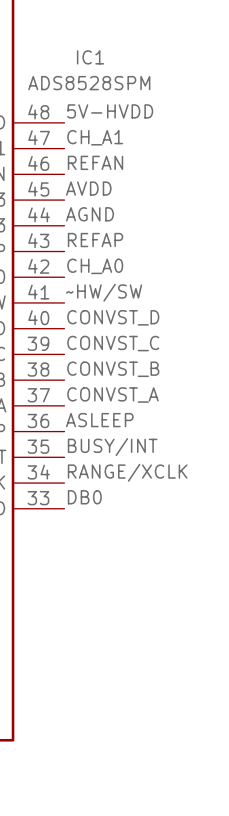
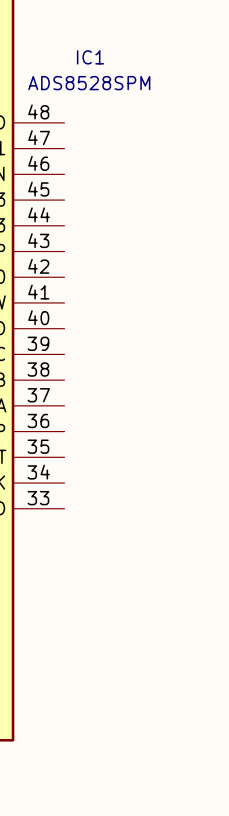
label: 5V-HVDD (110, 111) -> none
label: CH_A1 (95, 137) -> none
label: REFAN (95, 162) -> none
label: AVDD (88, 188) -> none
label: AGND (90, 214) -> none
label: REFAP (95, 240) -> none
label: CH_A0 (95, 266) -> none
label: ~HW/SW (104, 292) -> none
label: CONVST_D (113, 317) -> none
label: CONVST_C (113, 343) -> none
label: CONVST_B (113, 369) -> none
label: CONVST_A (112, 394) -> none
label: ASLEEP (99, 420) -> none
label: BUSY/INT (112, 447) -> none
label: RANGE/XCLK (127, 472) -> none
label: DB0 (84, 497) -> none

